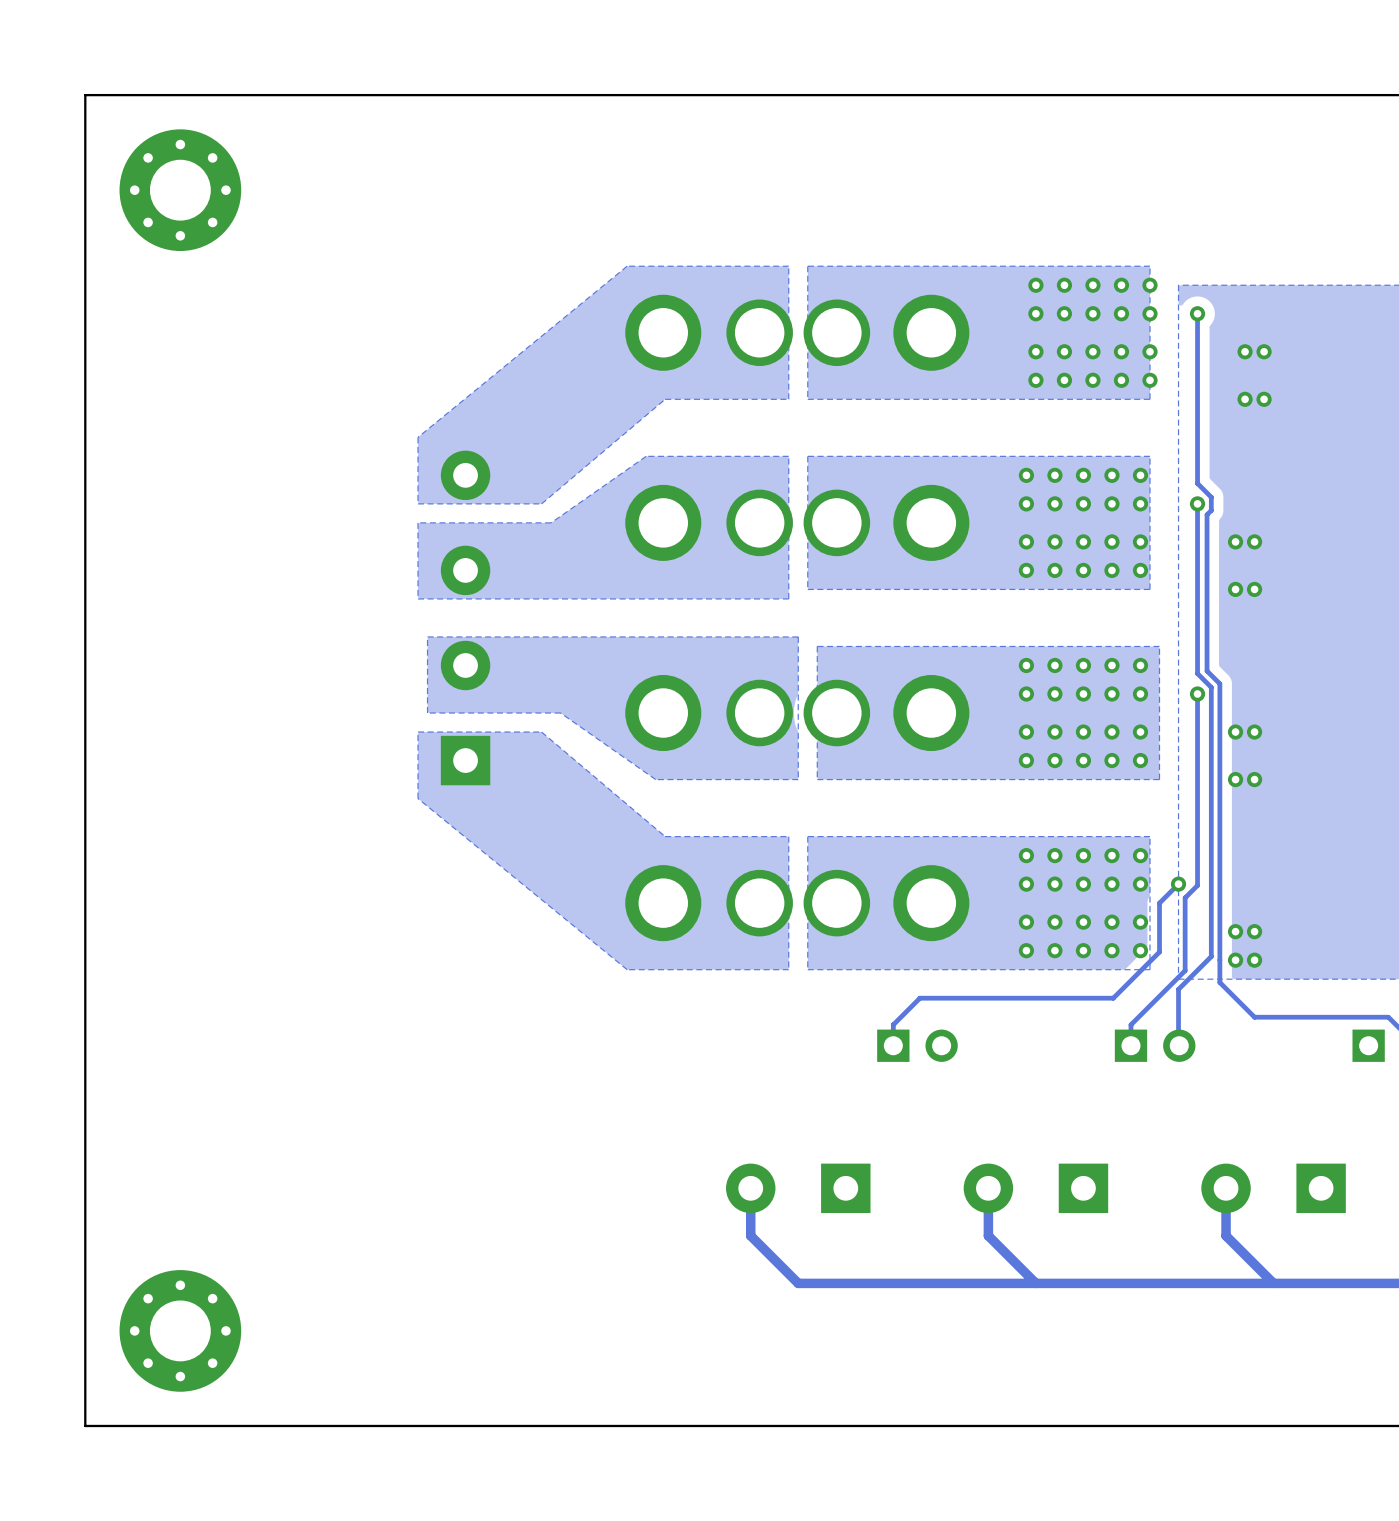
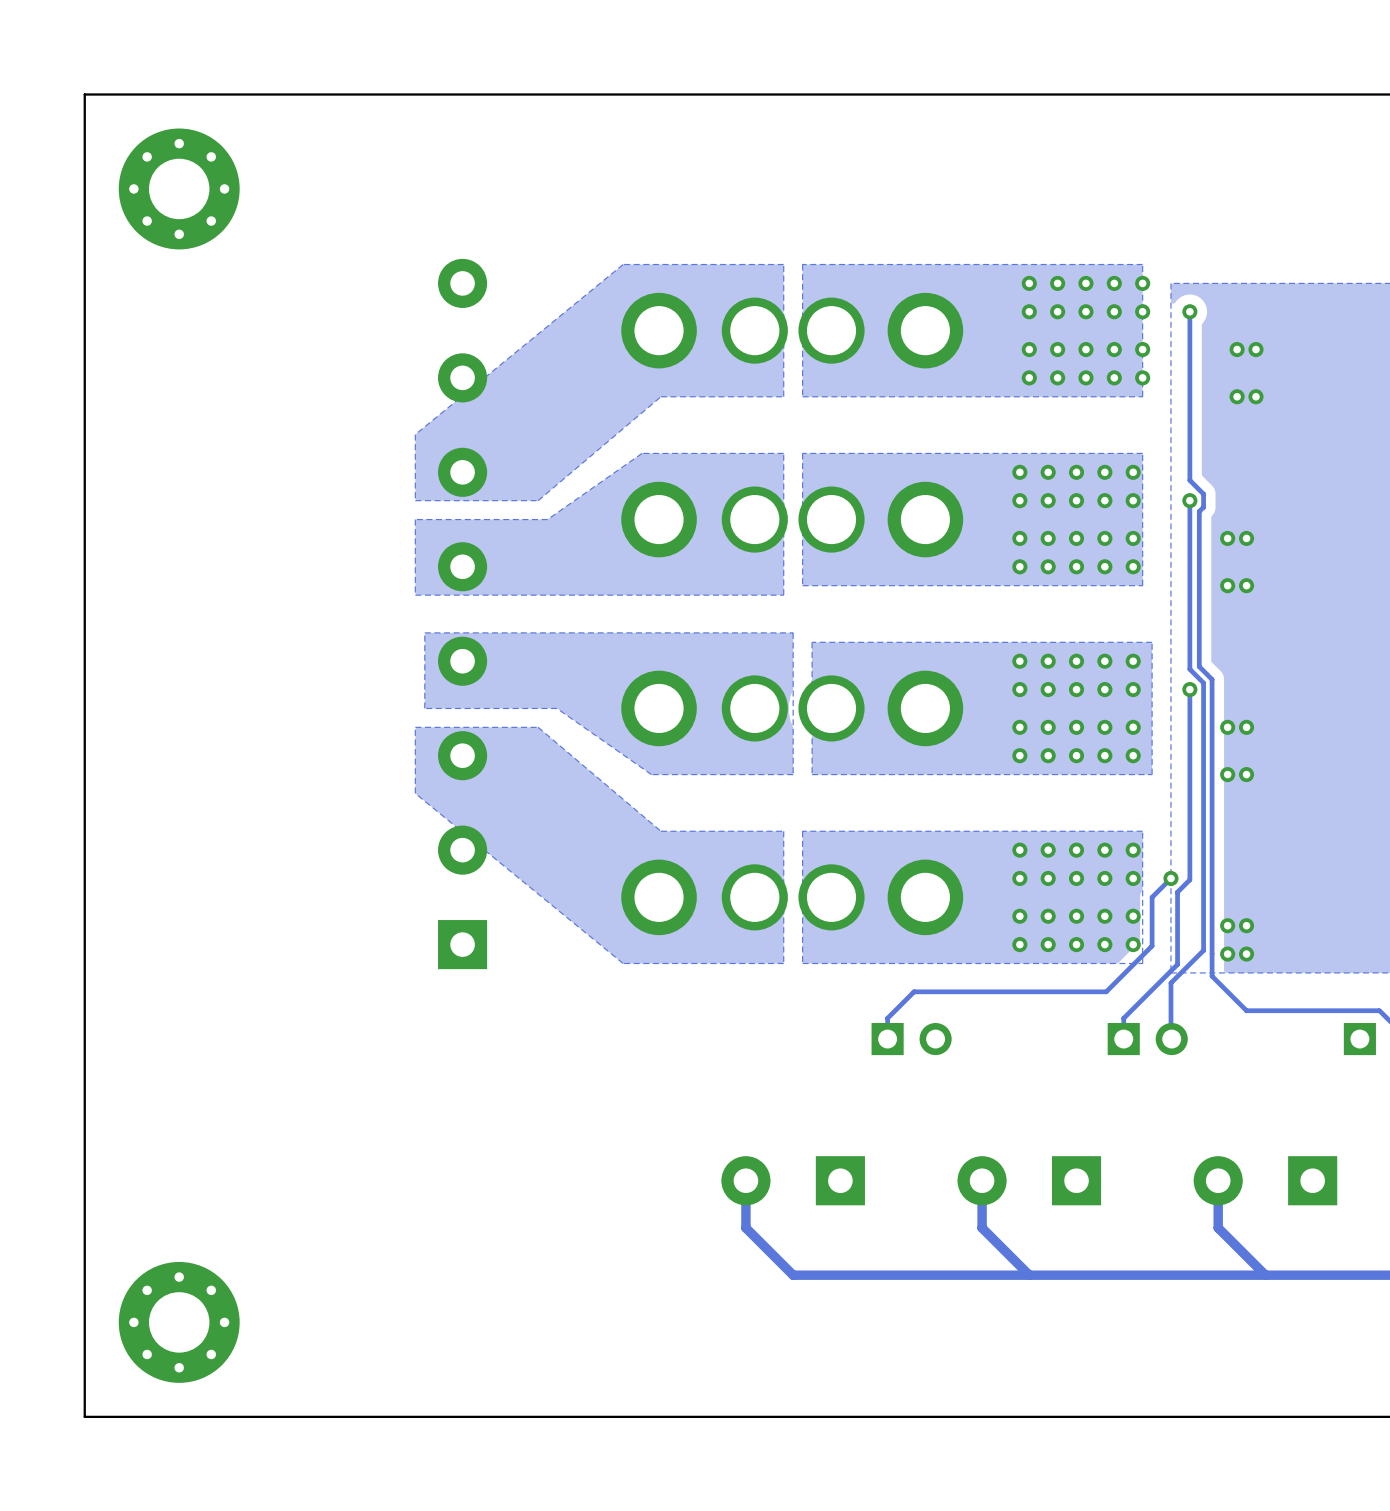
part footprint: [440, 450, 491, 786] -> [438, 258, 488, 970]

